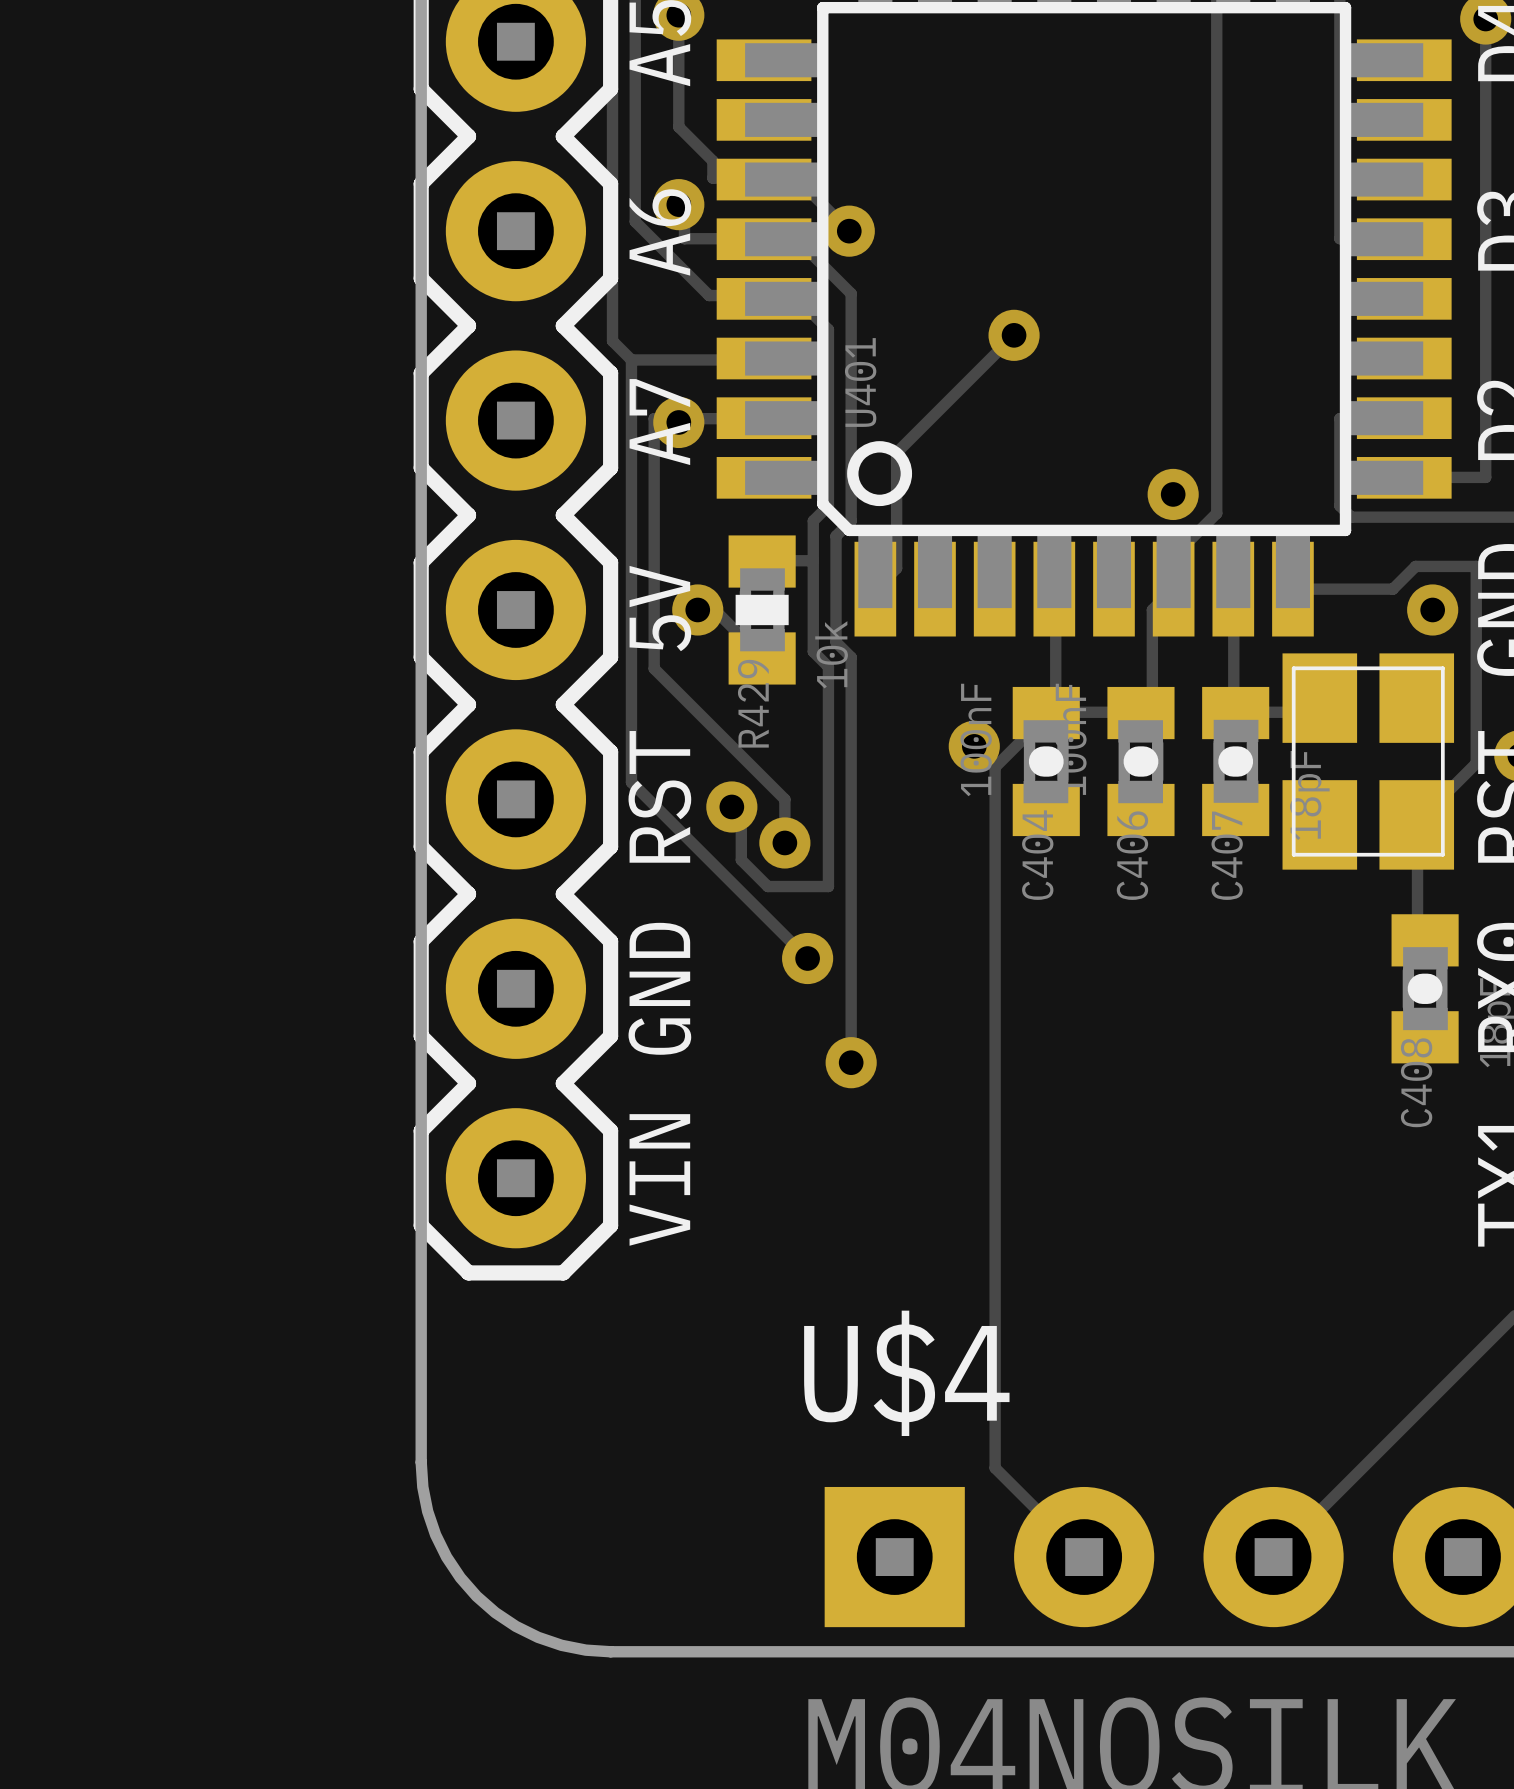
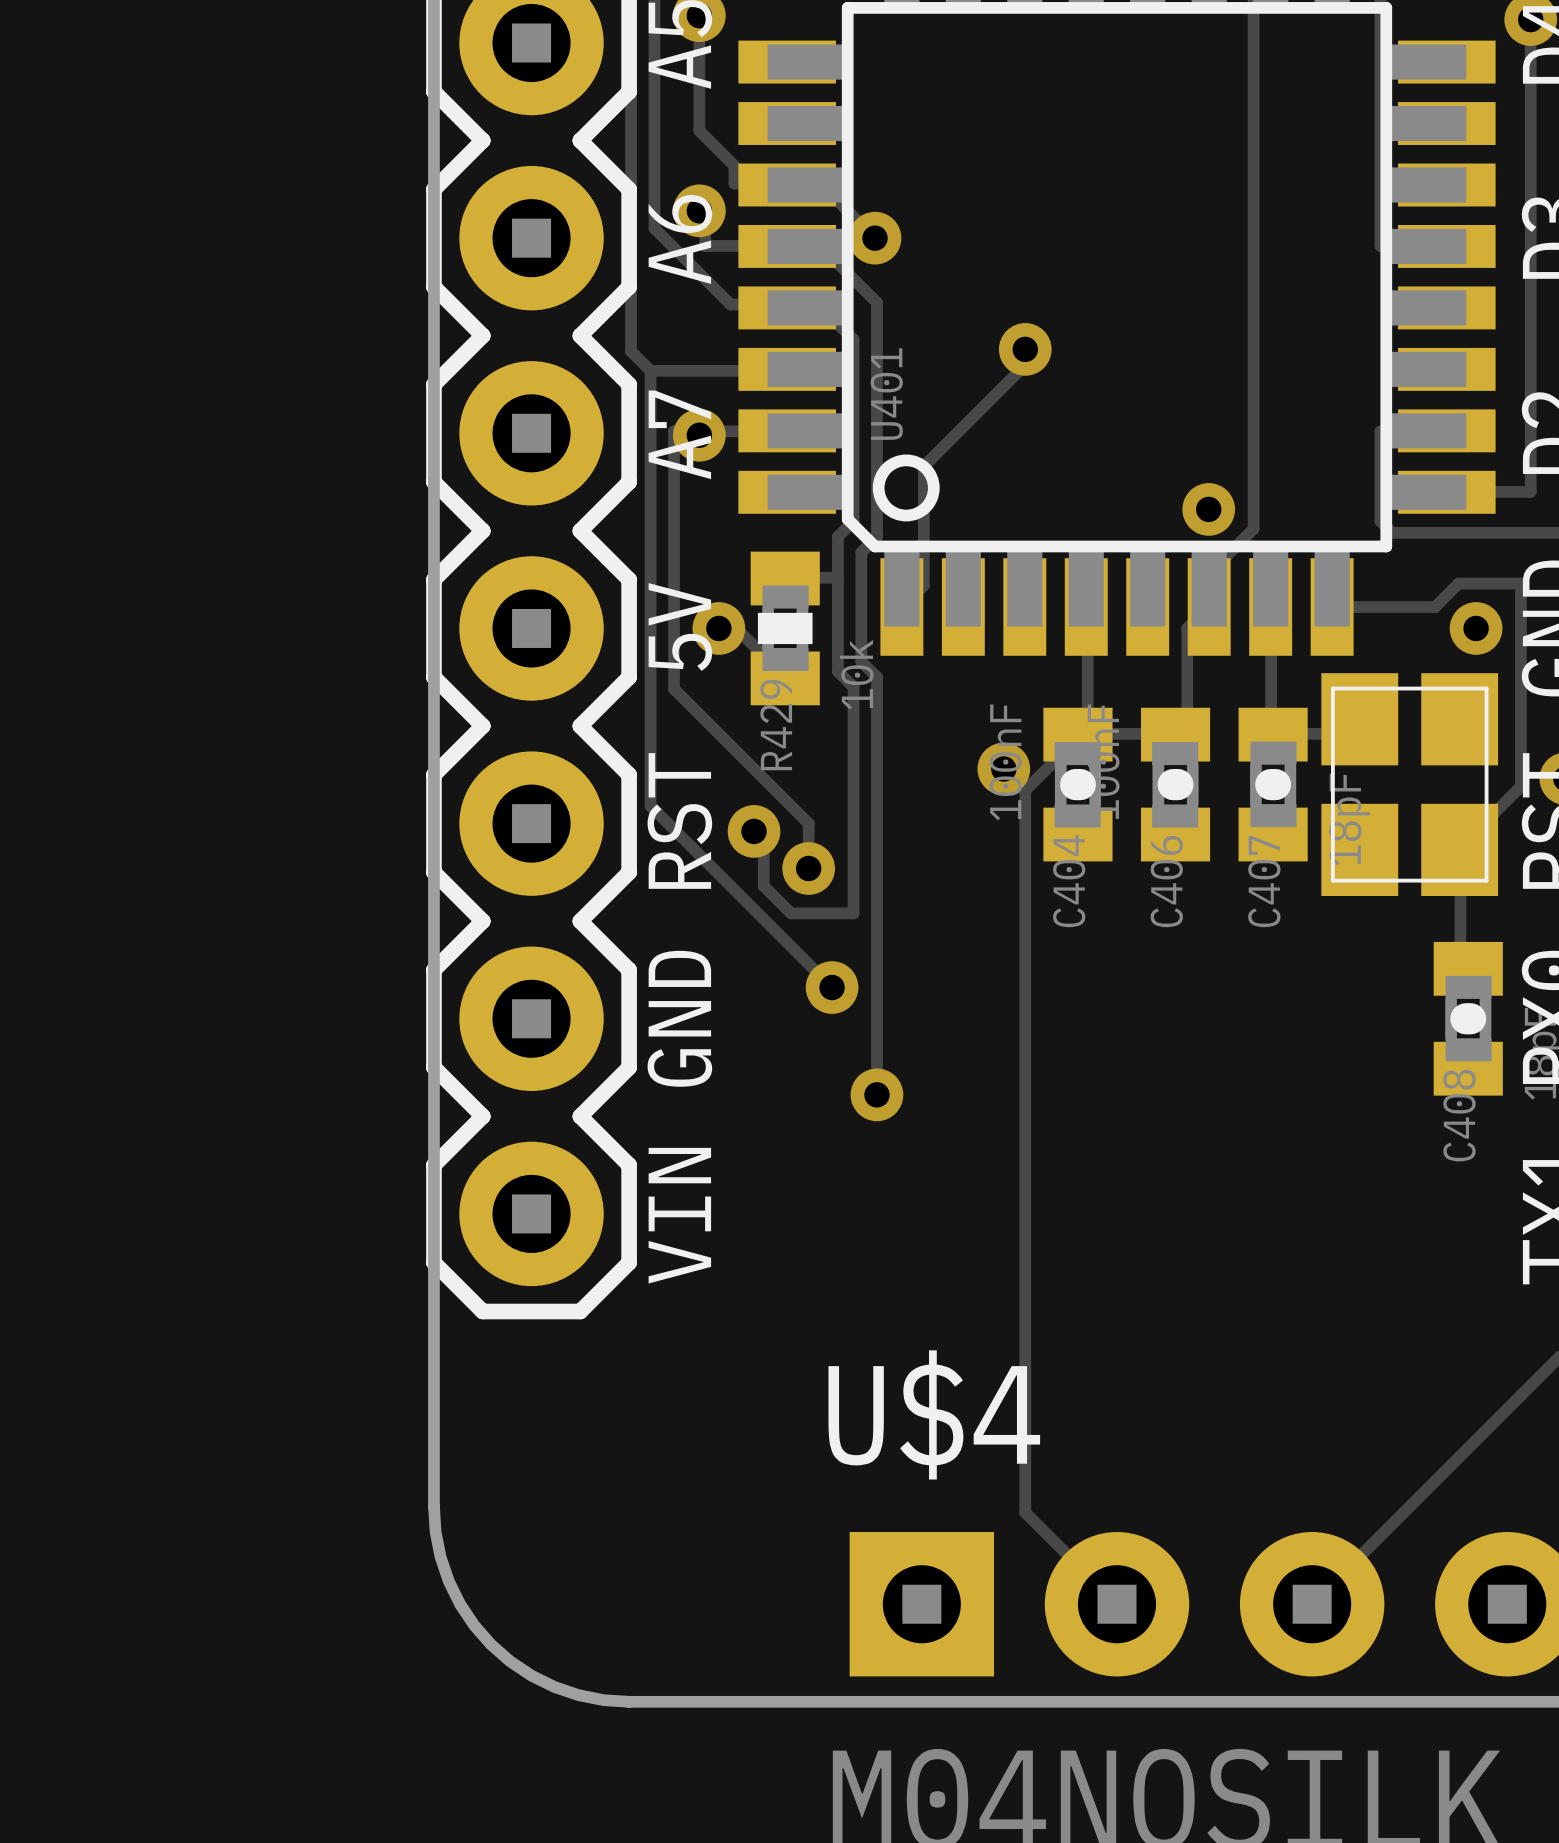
via position: (1014, 335) -> (1025, 349)

